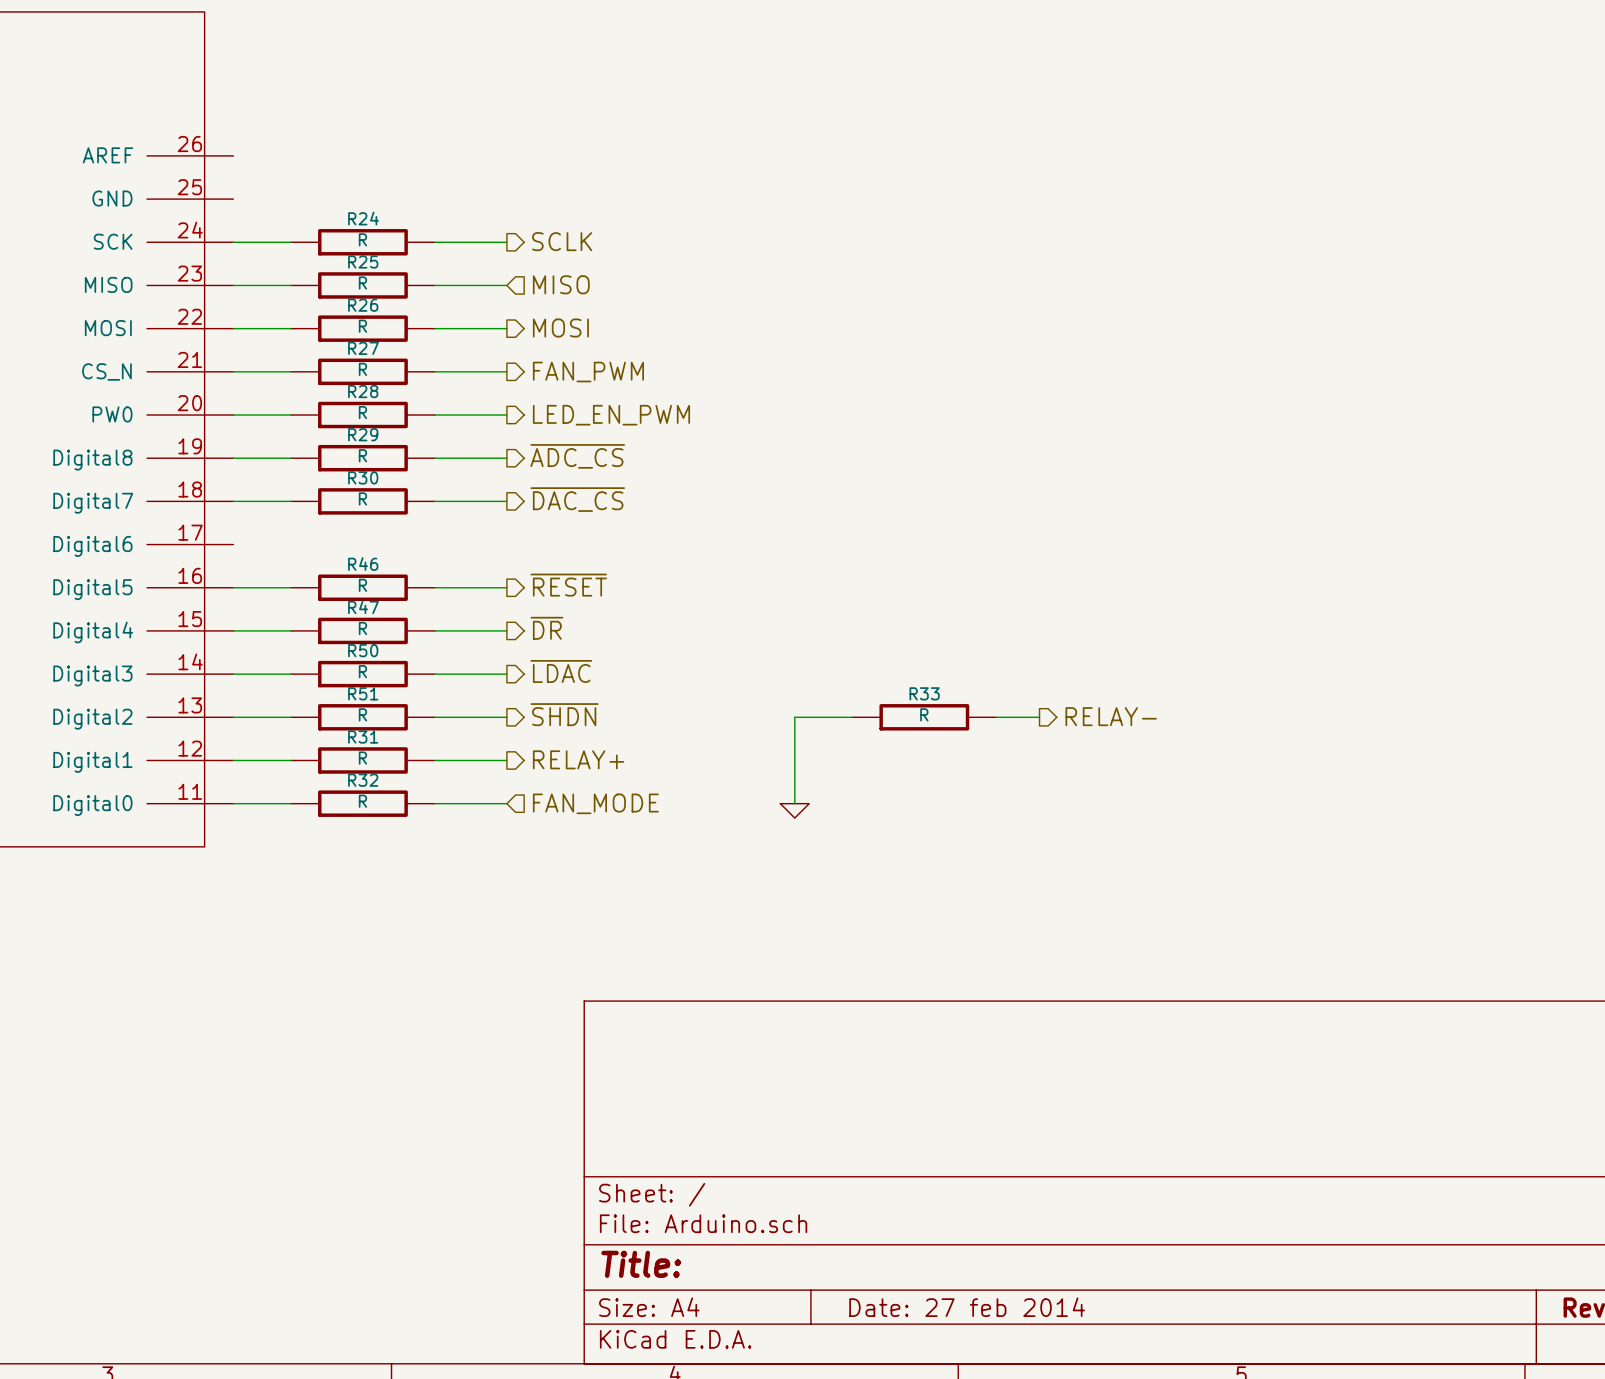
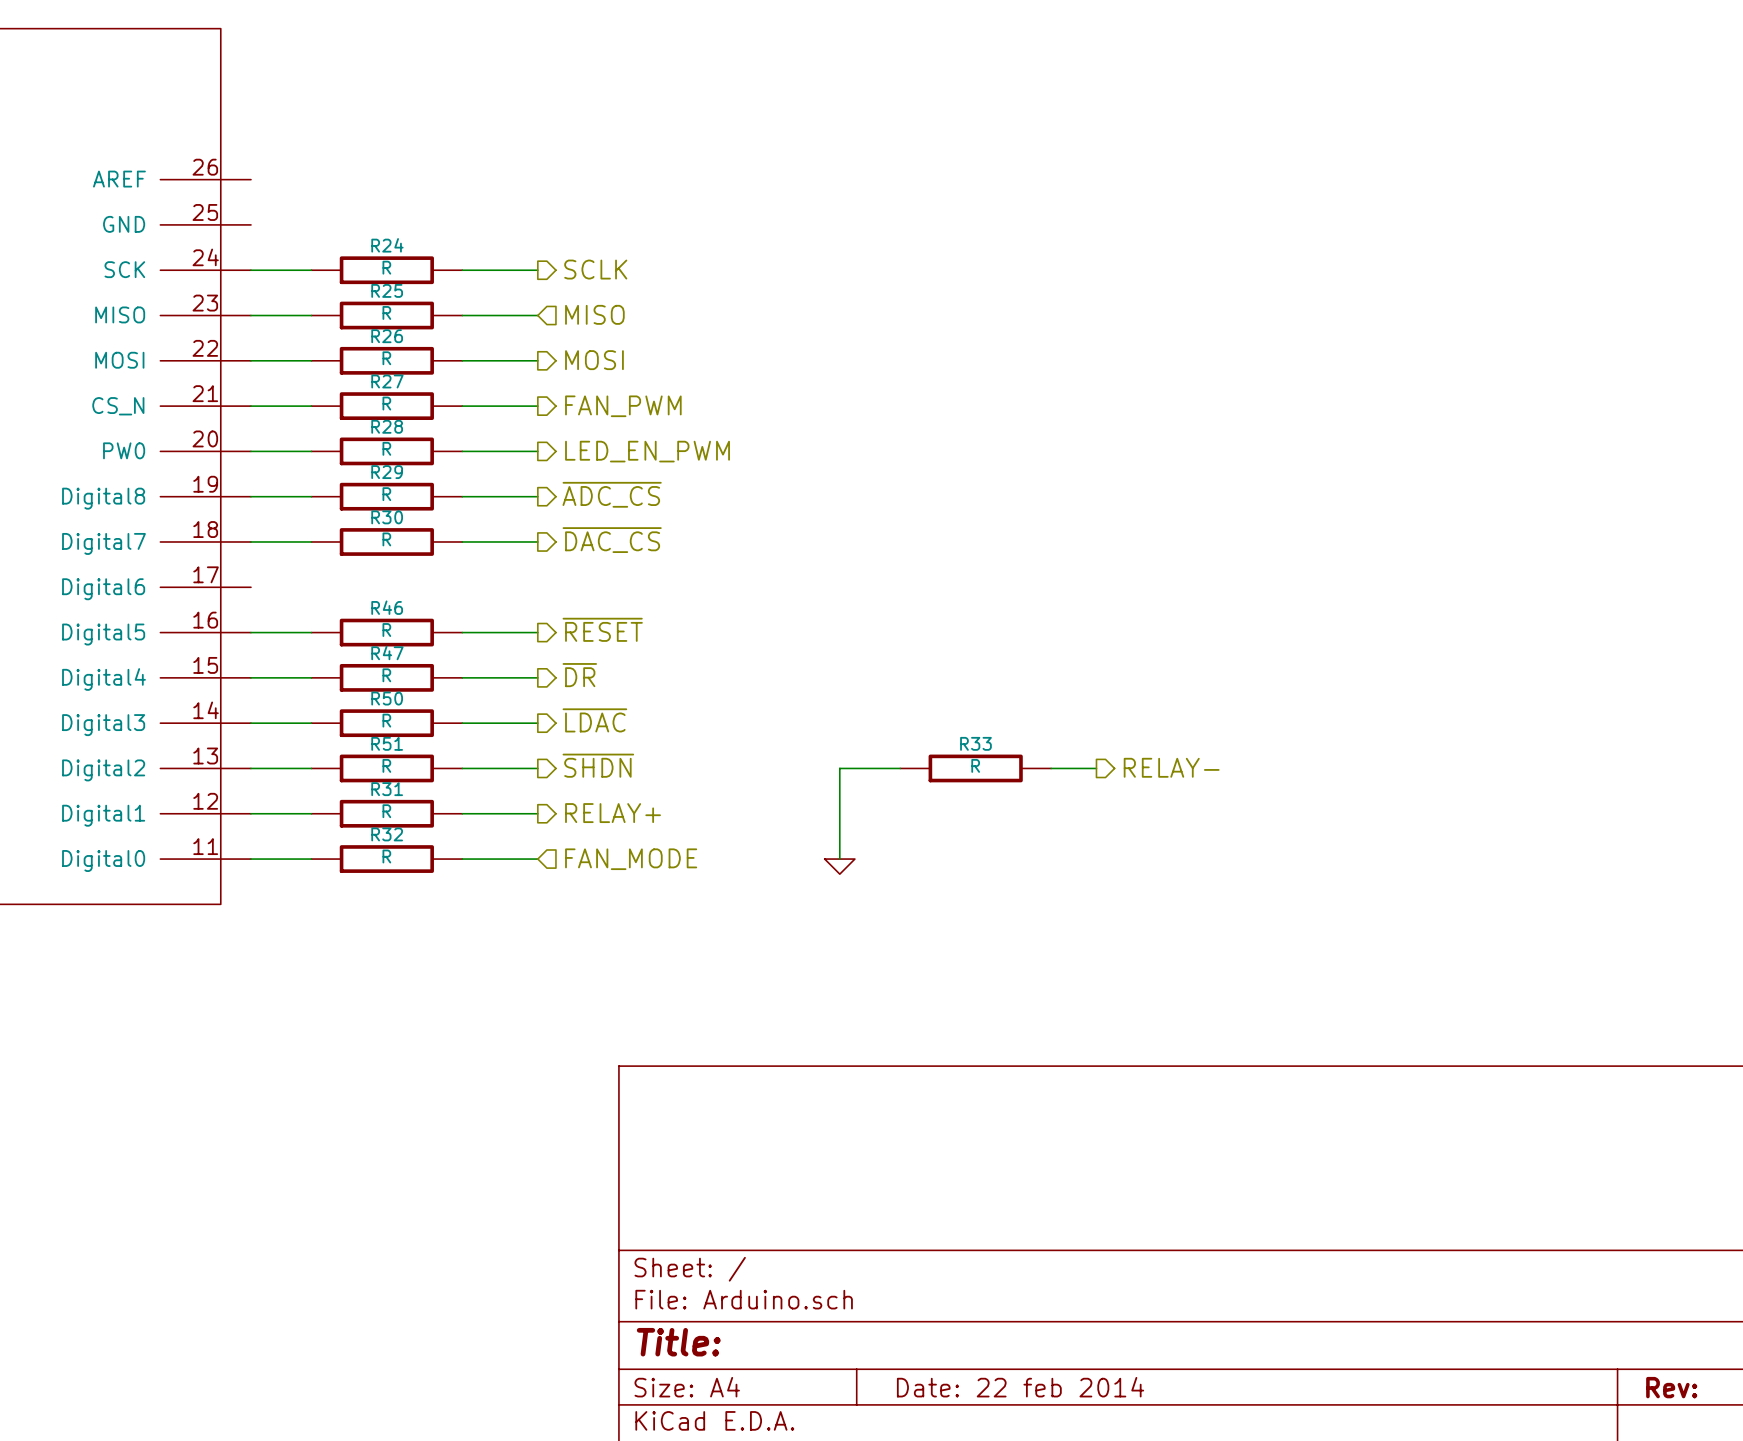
title block: Date: 27 feb 2014 (967, 1307) -> Date: 22 feb 2014 (1020, 1387)

